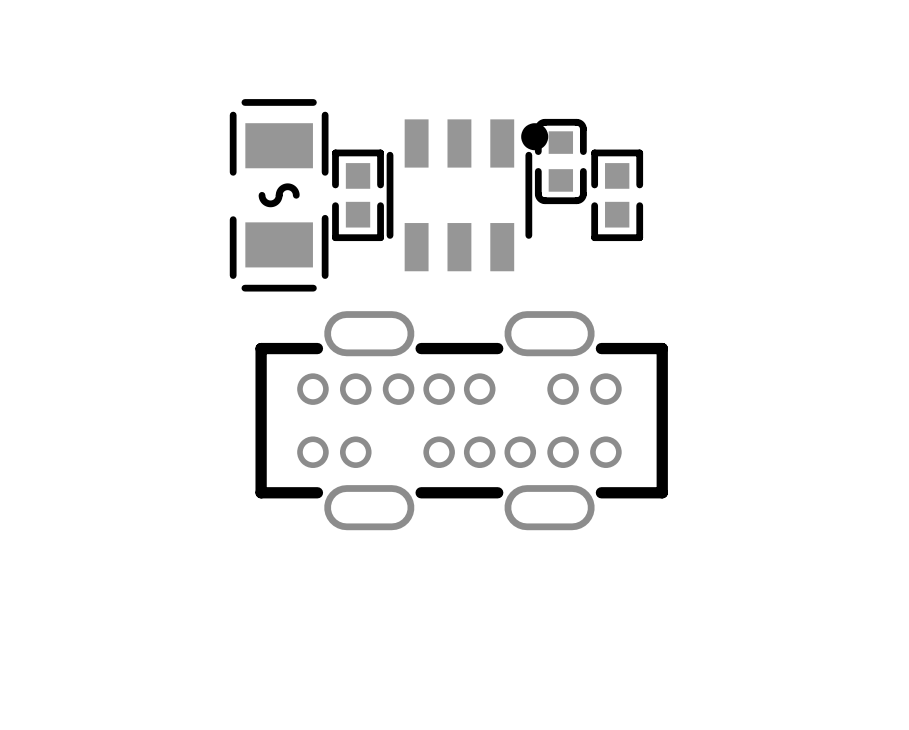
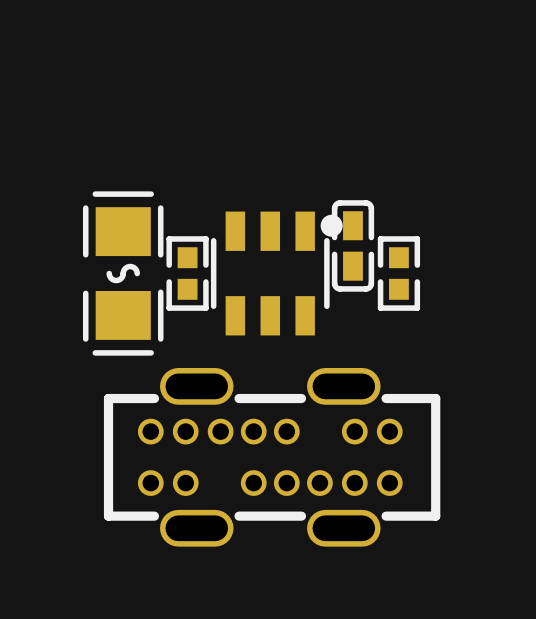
part footprint: [229, 99, 329, 292] -> [82, 191, 164, 356]
part footprint: [534, 118, 587, 205] -> [331, 200, 375, 292]

